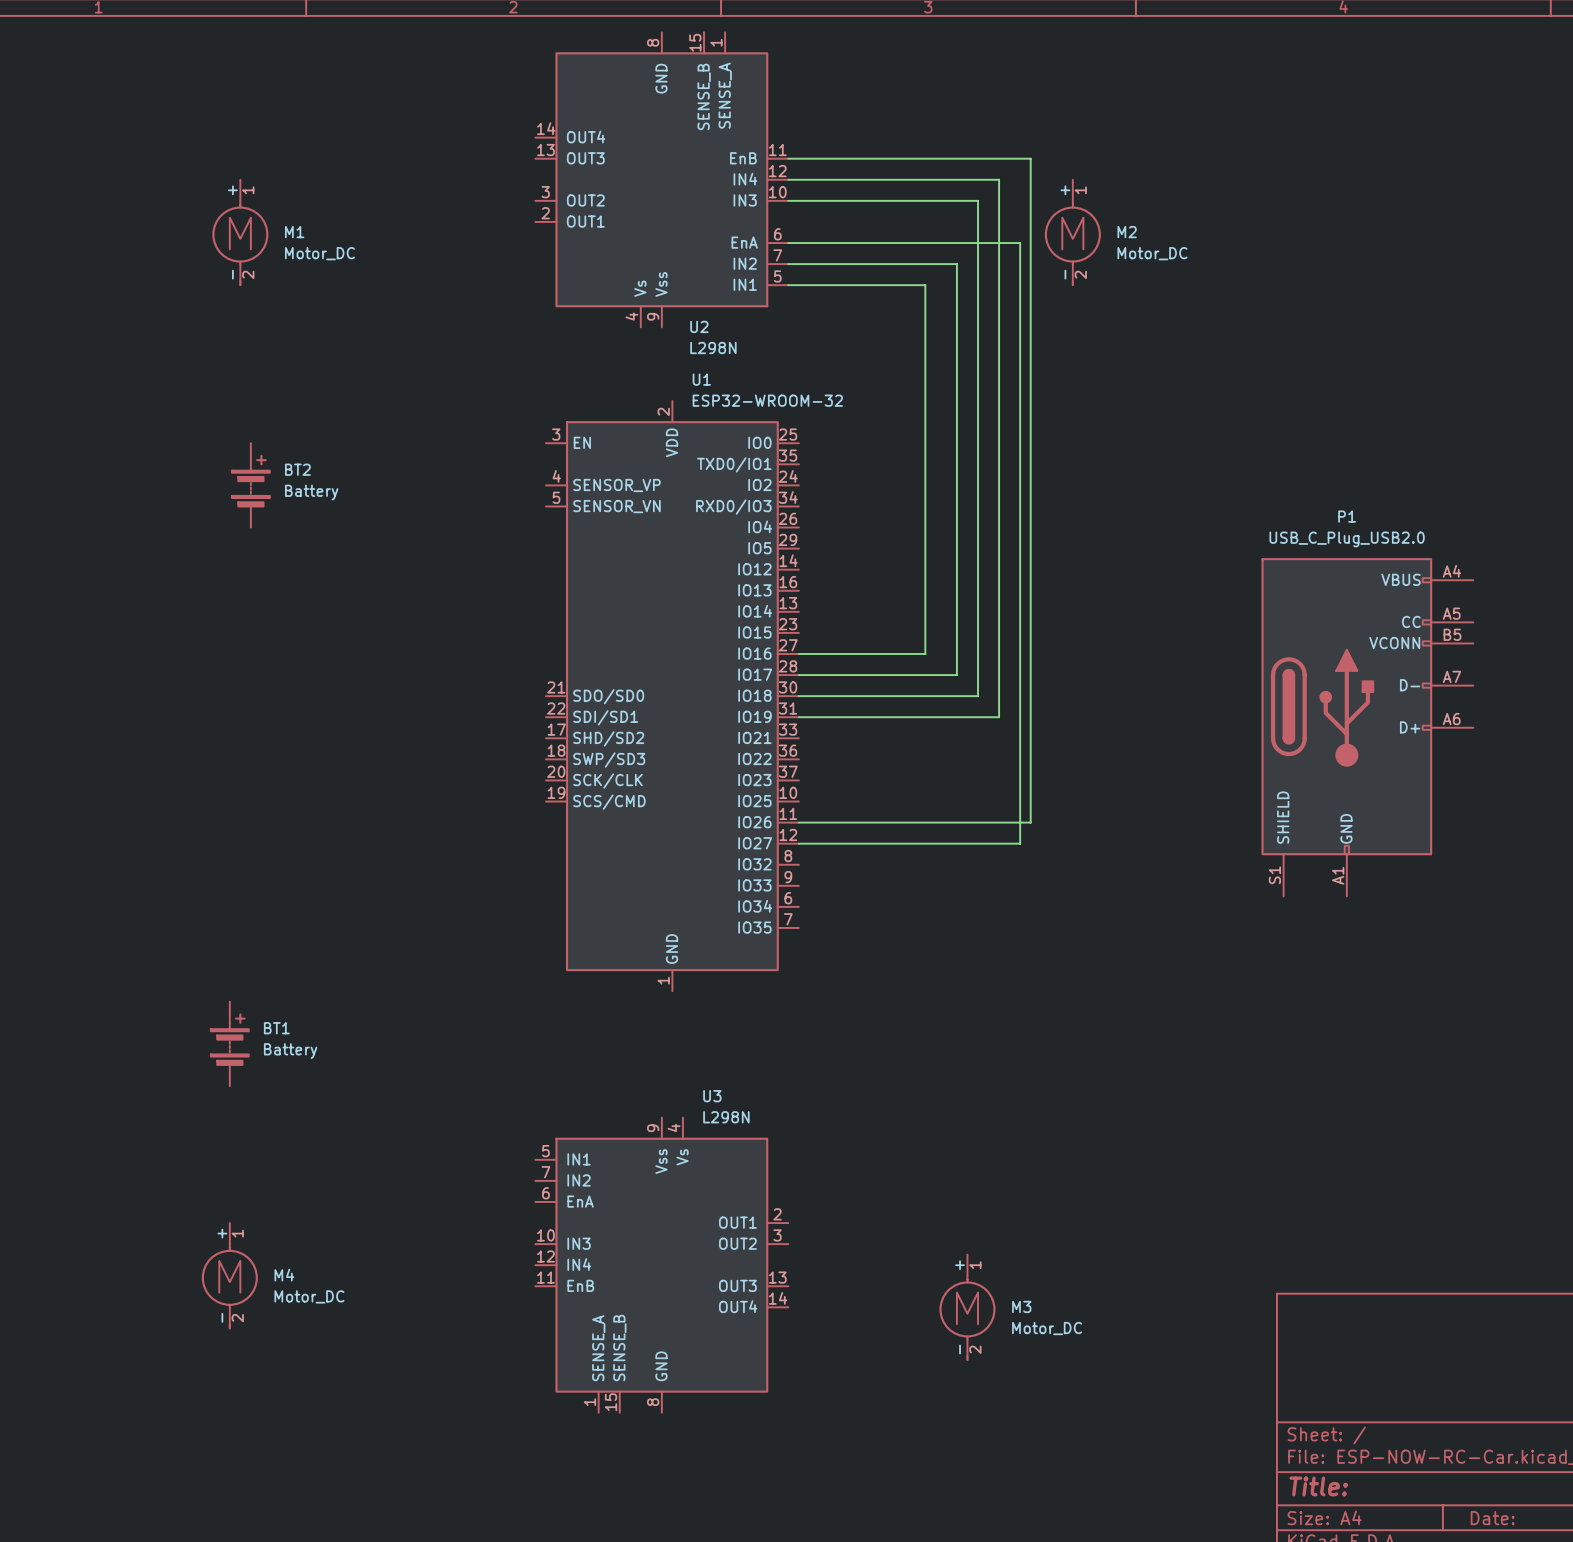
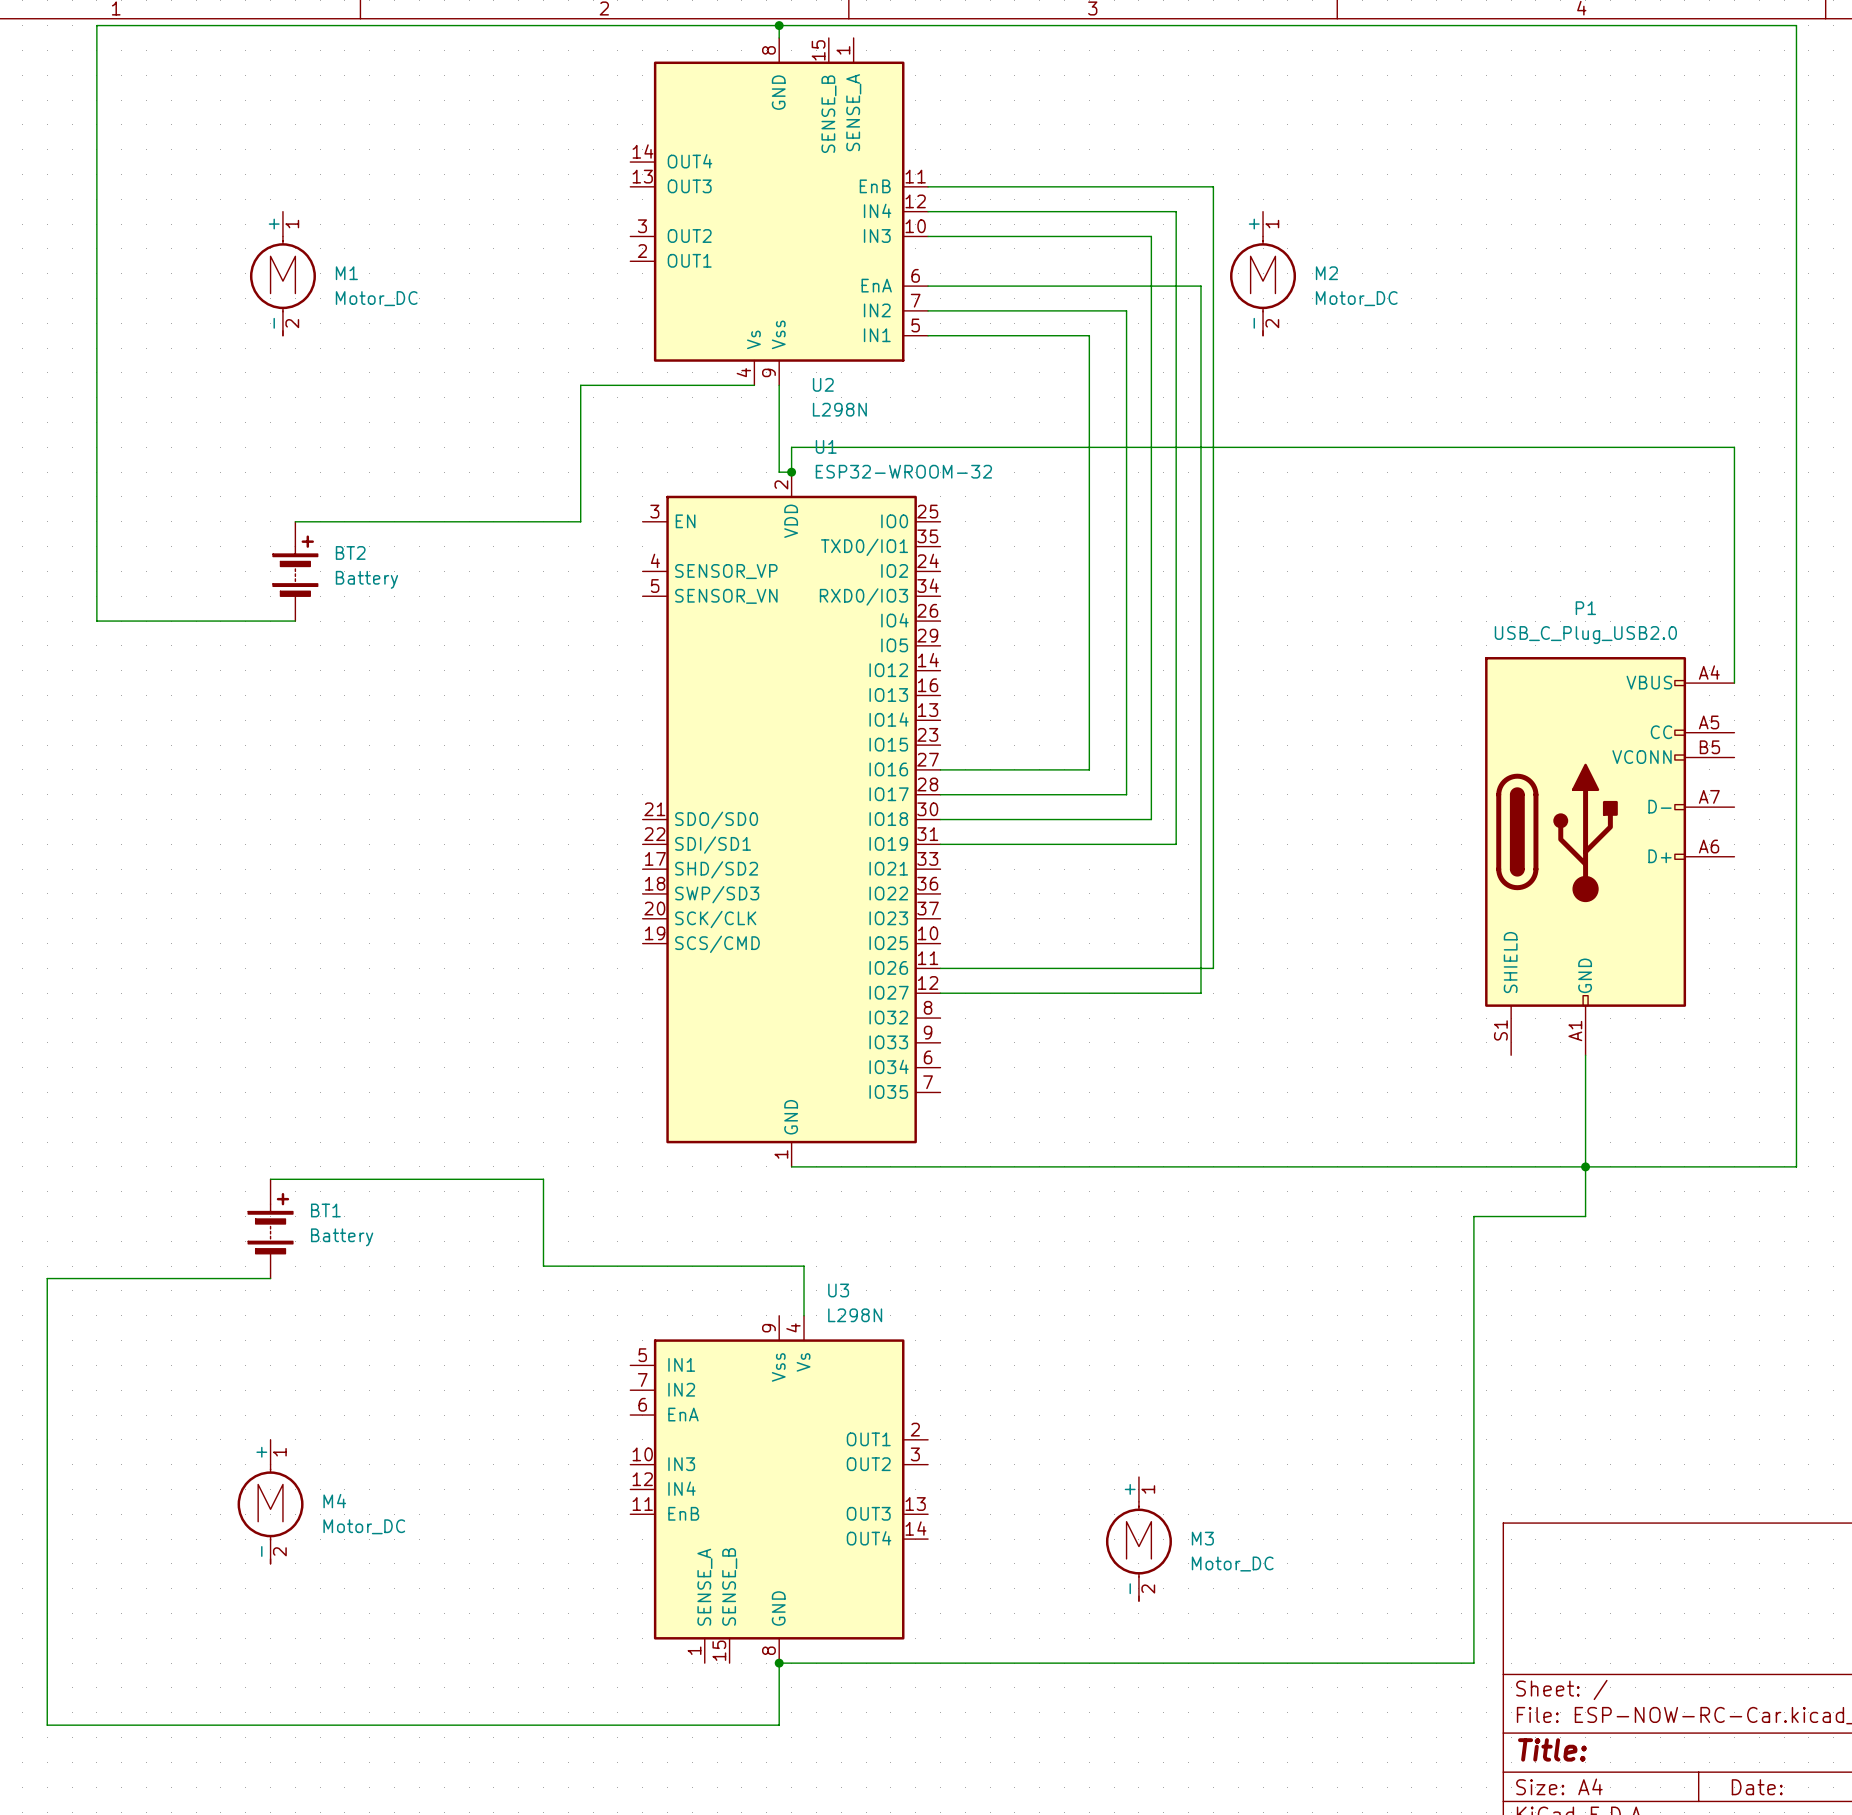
wire: none -> (779, 25) (779, 37)
junction: none -> (779, 25)
wire: none -> (754, 385) (580, 385) (580, 521) (295, 521)
wire: none -> (779, 385) (779, 472) (791, 472) (791, 447) (1734, 447) (1734, 683)
junction: none -> (791, 472)
wire: none -> (295, 621) (96, 621) (96, 25) (1796, 25) (1796, 1166) (791, 1166)
wire: none -> (1585, 1055) (1585, 1216) (1473, 1216) (1473, 1663) (779, 1663) (779, 1725) (47, 1725) (47, 1278) (270, 1278)
junction: none -> (1585, 1166)
wire: none -> (270, 1179) (543, 1179) (543, 1266) (804, 1266) (804, 1315)
junction: none -> (779, 1663)

